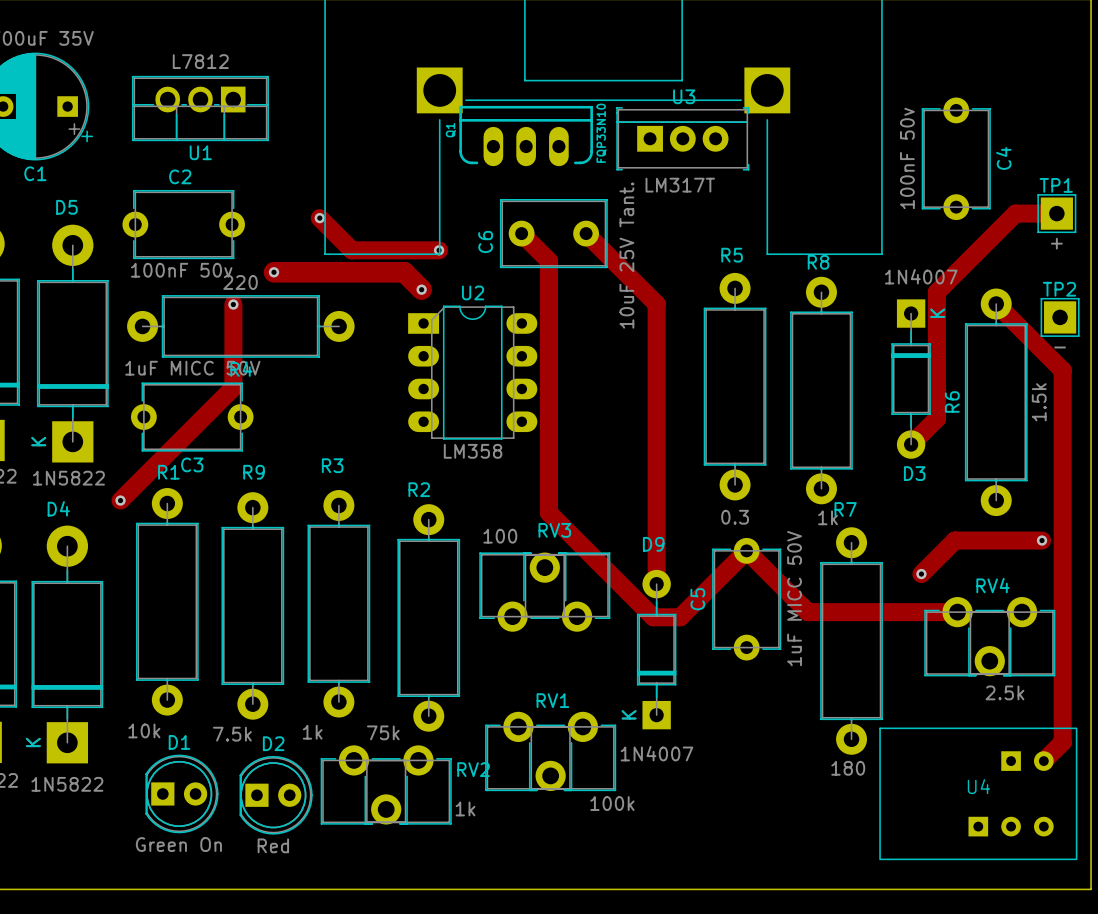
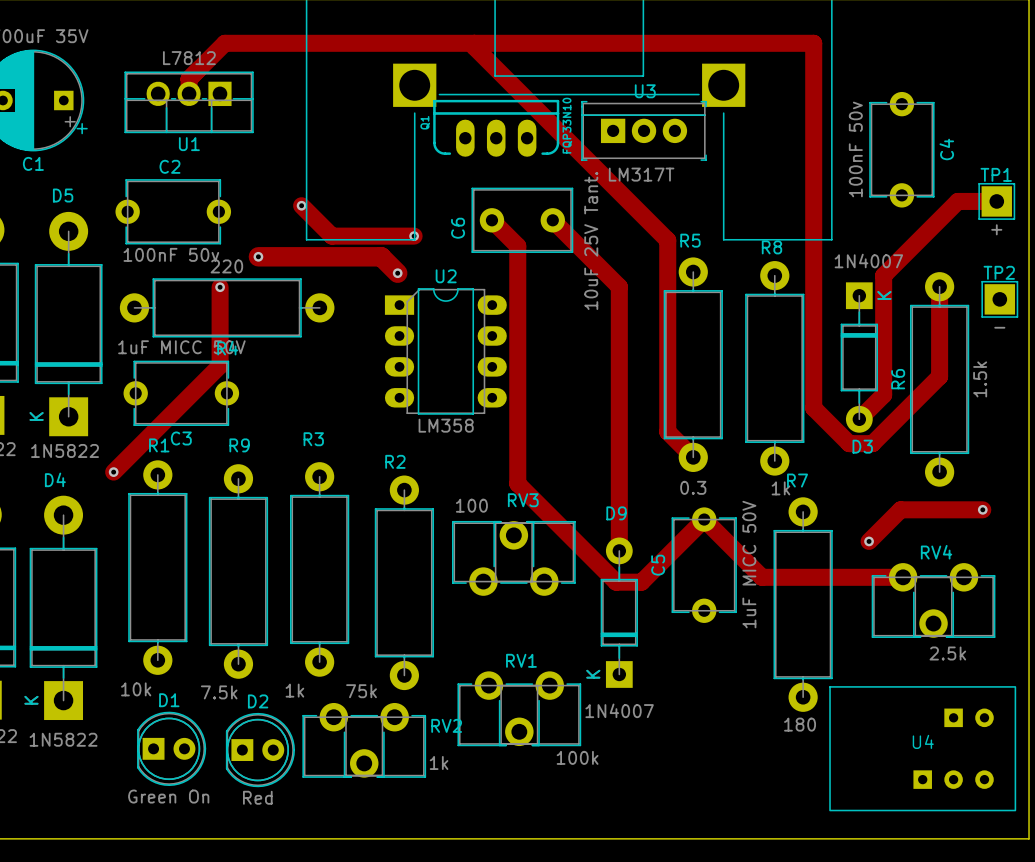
track: none -> (474, 43) (474, 46) (667, 240) (667, 431) (693, 457)
track: (996, 304) (1062, 370) (1062, 742) (1043, 761) -> (939, 286) (939, 376) (872, 443) (849, 443) (813, 408) (813, 43) (224, 43) (189, 79) (189, 93)

